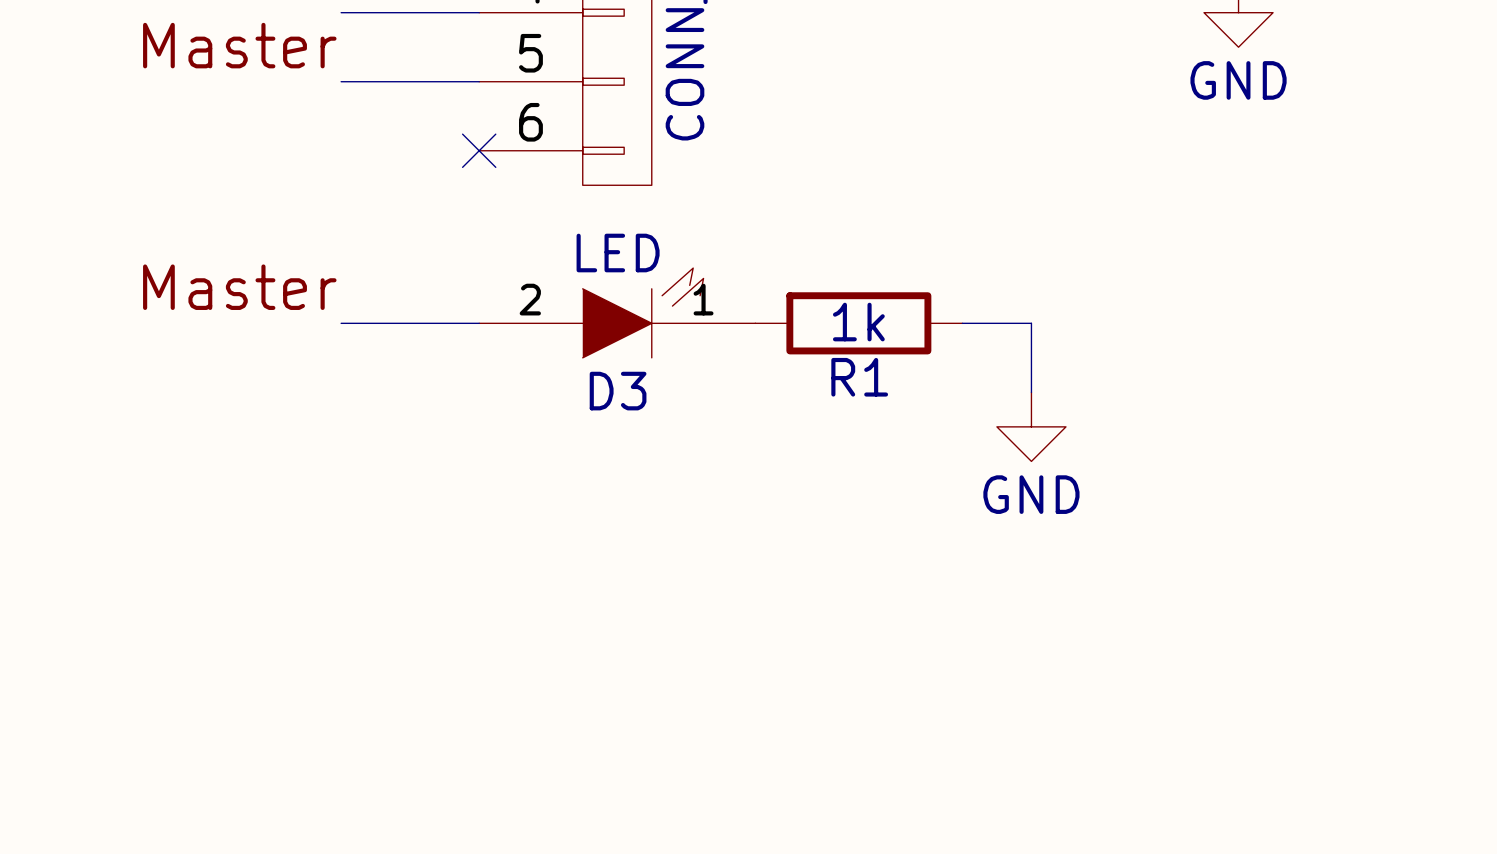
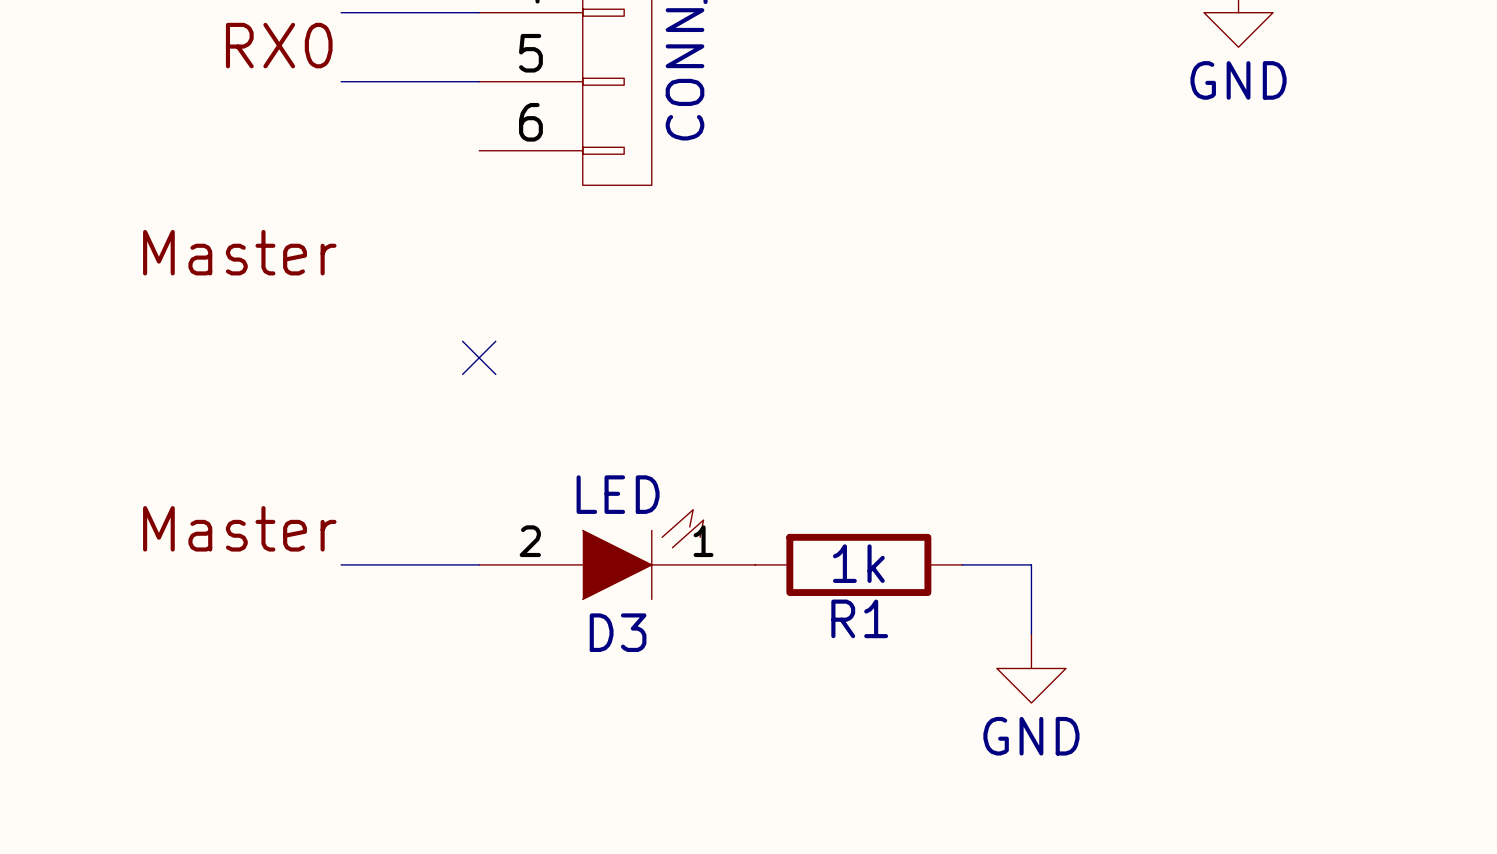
label: Master (239, 45) -> RX0 (279, 45)
no-connect mark: (479, 150) -> none
label position: Master (239, 287) -> Master (239, 252)
D3 position: (617, 312) -> (617, 554)
wire: (341, 323) (479, 323) -> (341, 564) (479, 564)
R1 position: (858, 323) -> (858, 564)
wire: (962, 323) (1031, 323) (1031, 392) -> (962, 564) (1031, 564) (1031, 633)
no-connect mark: none -> (479, 357)
power symbol position: GND (1031, 426) -> GND (1031, 668)
label: none -> Master (239, 528)

